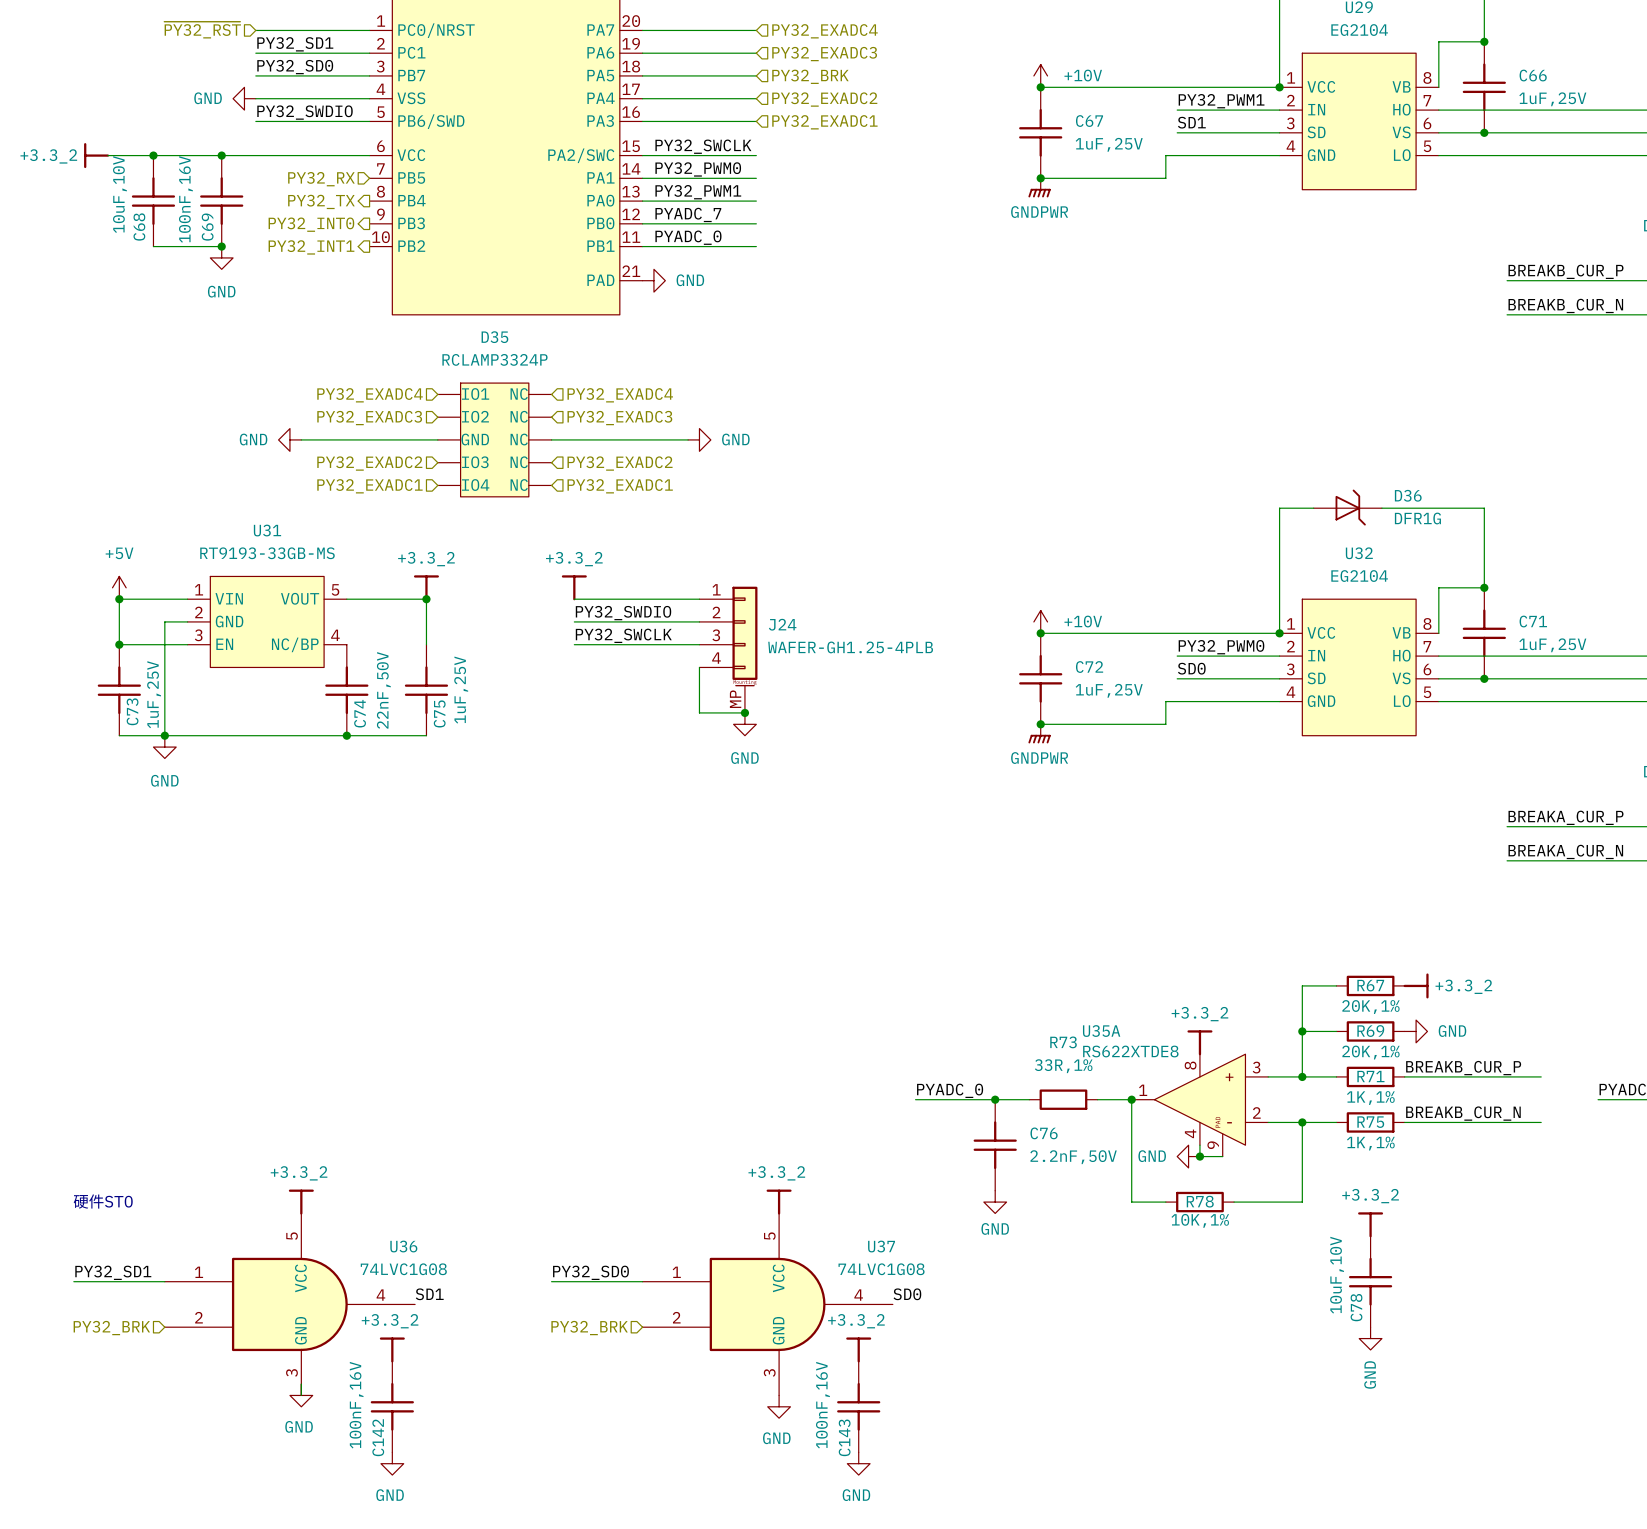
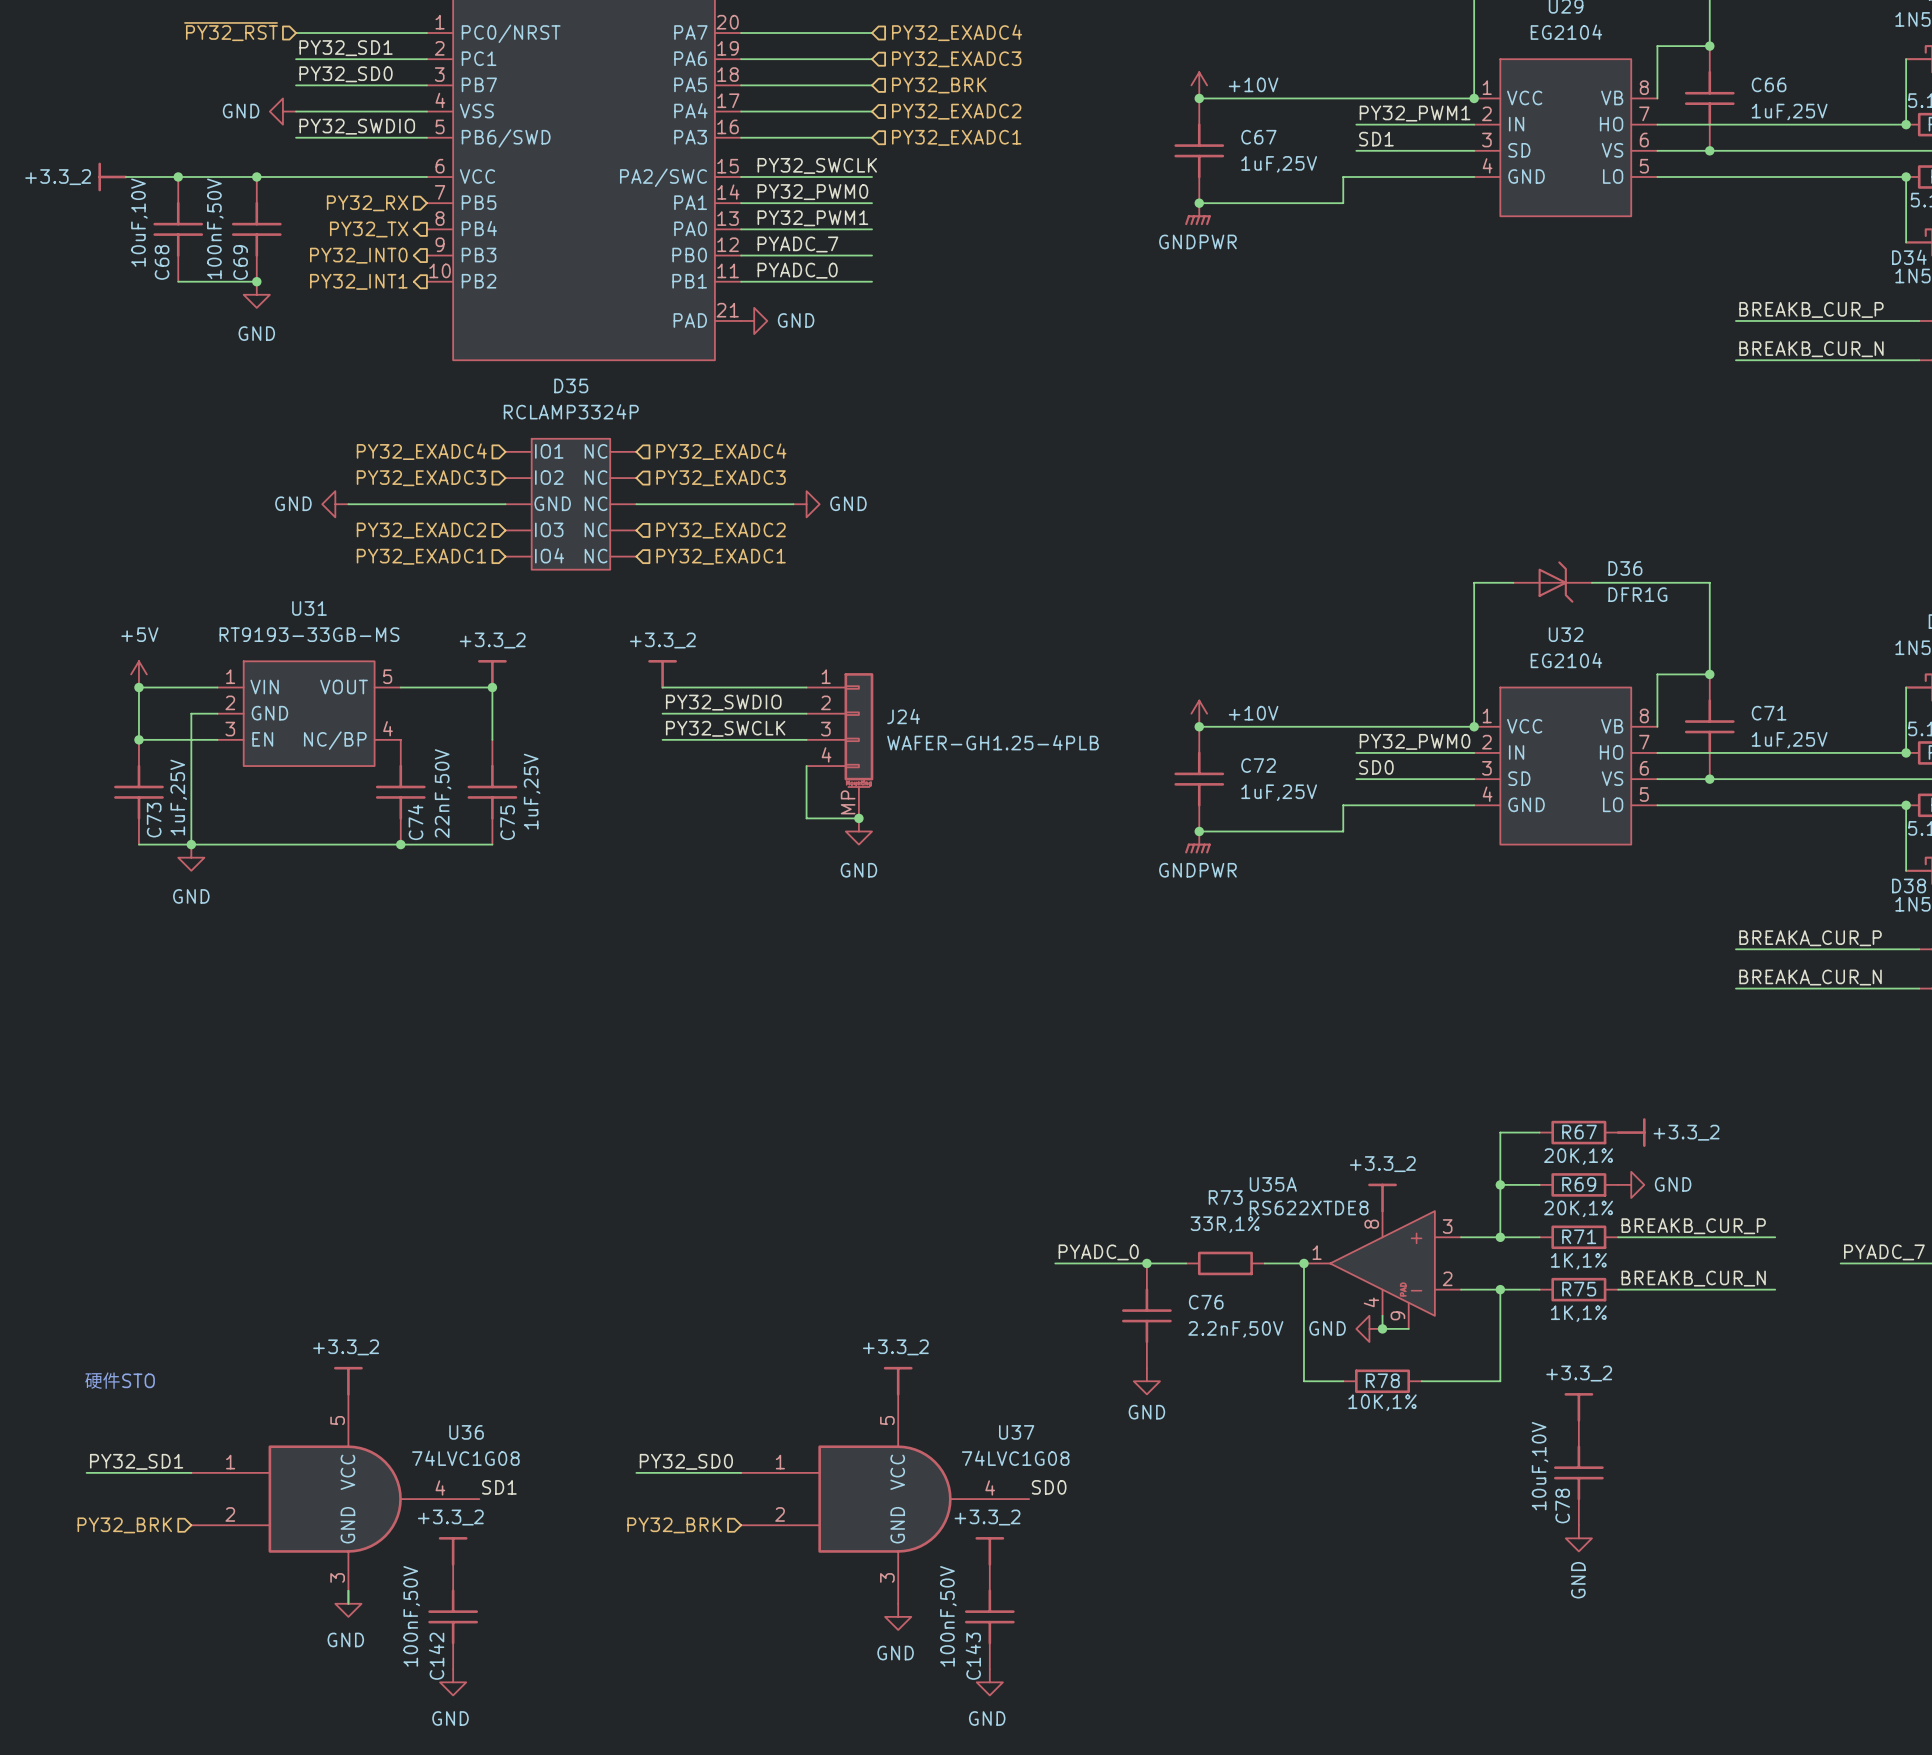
C69 value: 100nF,16V (185, 199) -> 100nF,50V (215, 228)
C142 value: 100nF,16V (356, 1405) -> 100nF,50V (411, 1616)
C143 value: 100nF,16V (822, 1405) -> 100nF,50V (948, 1616)

